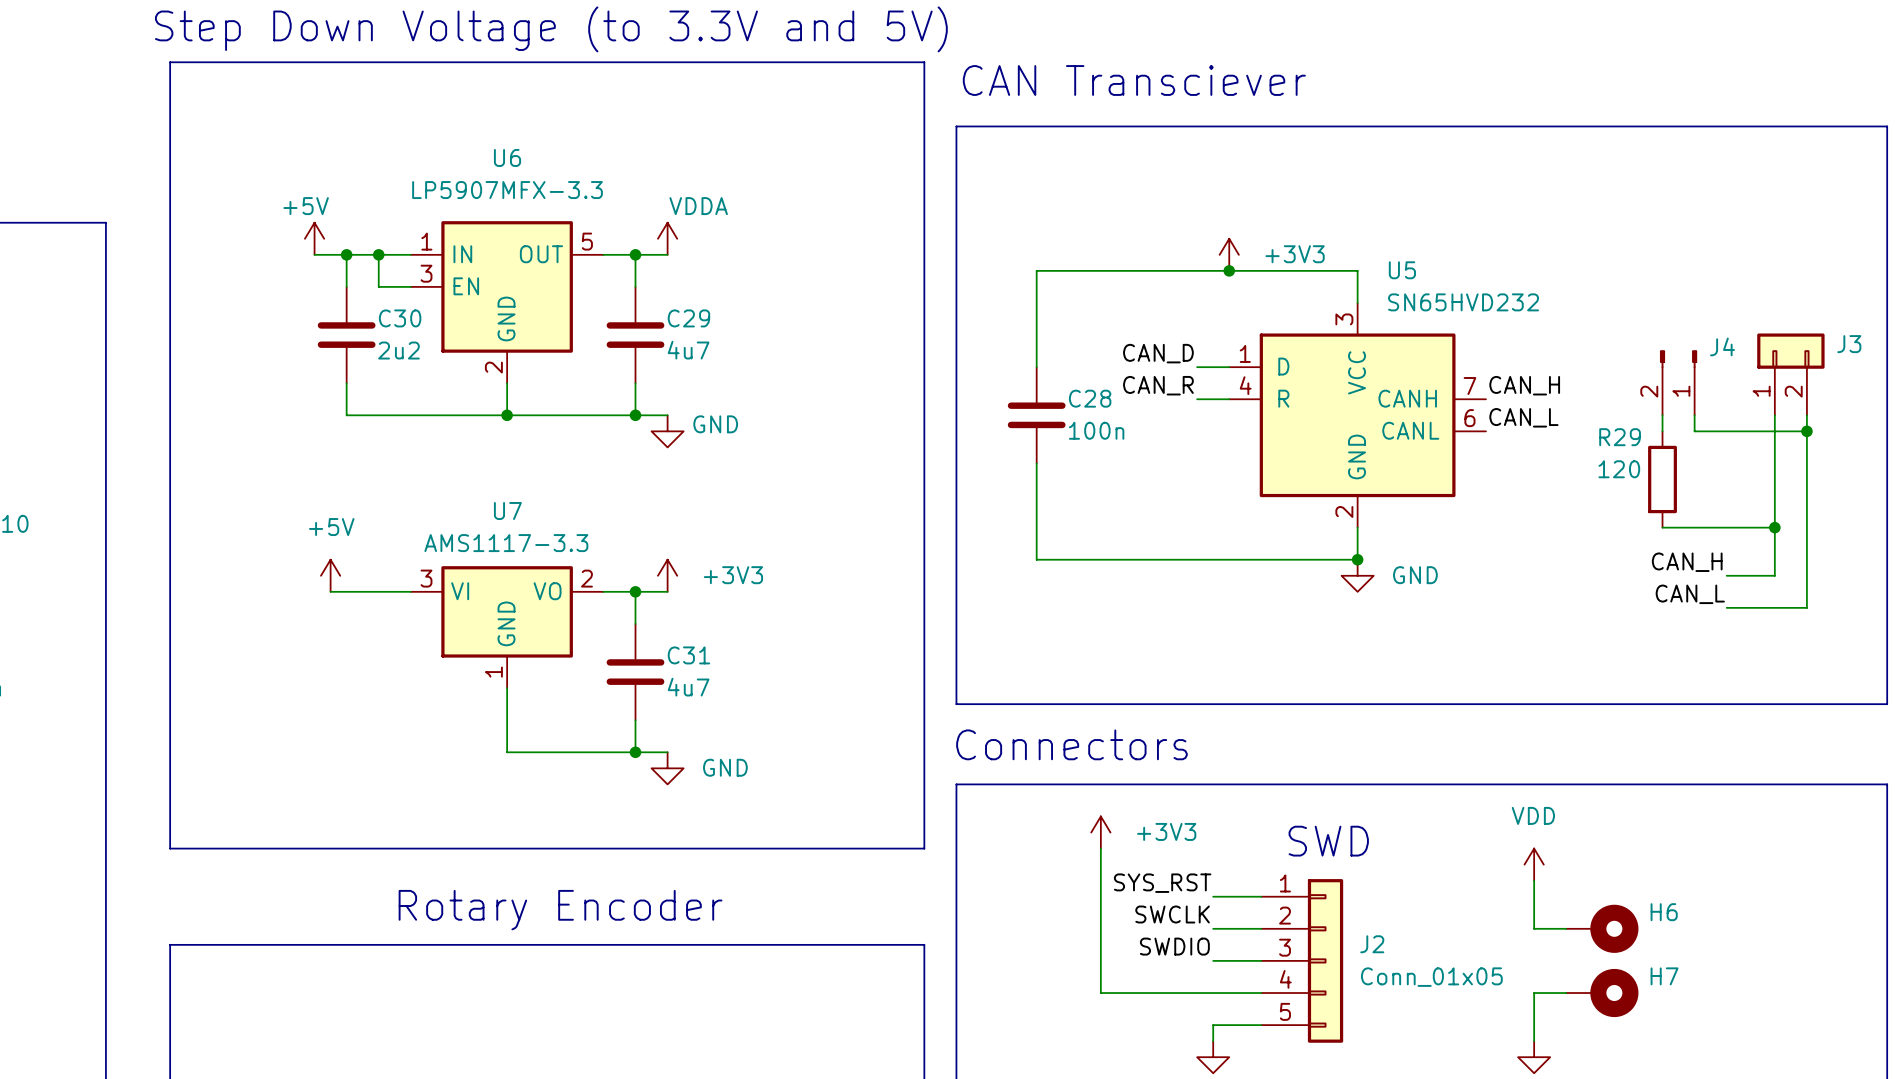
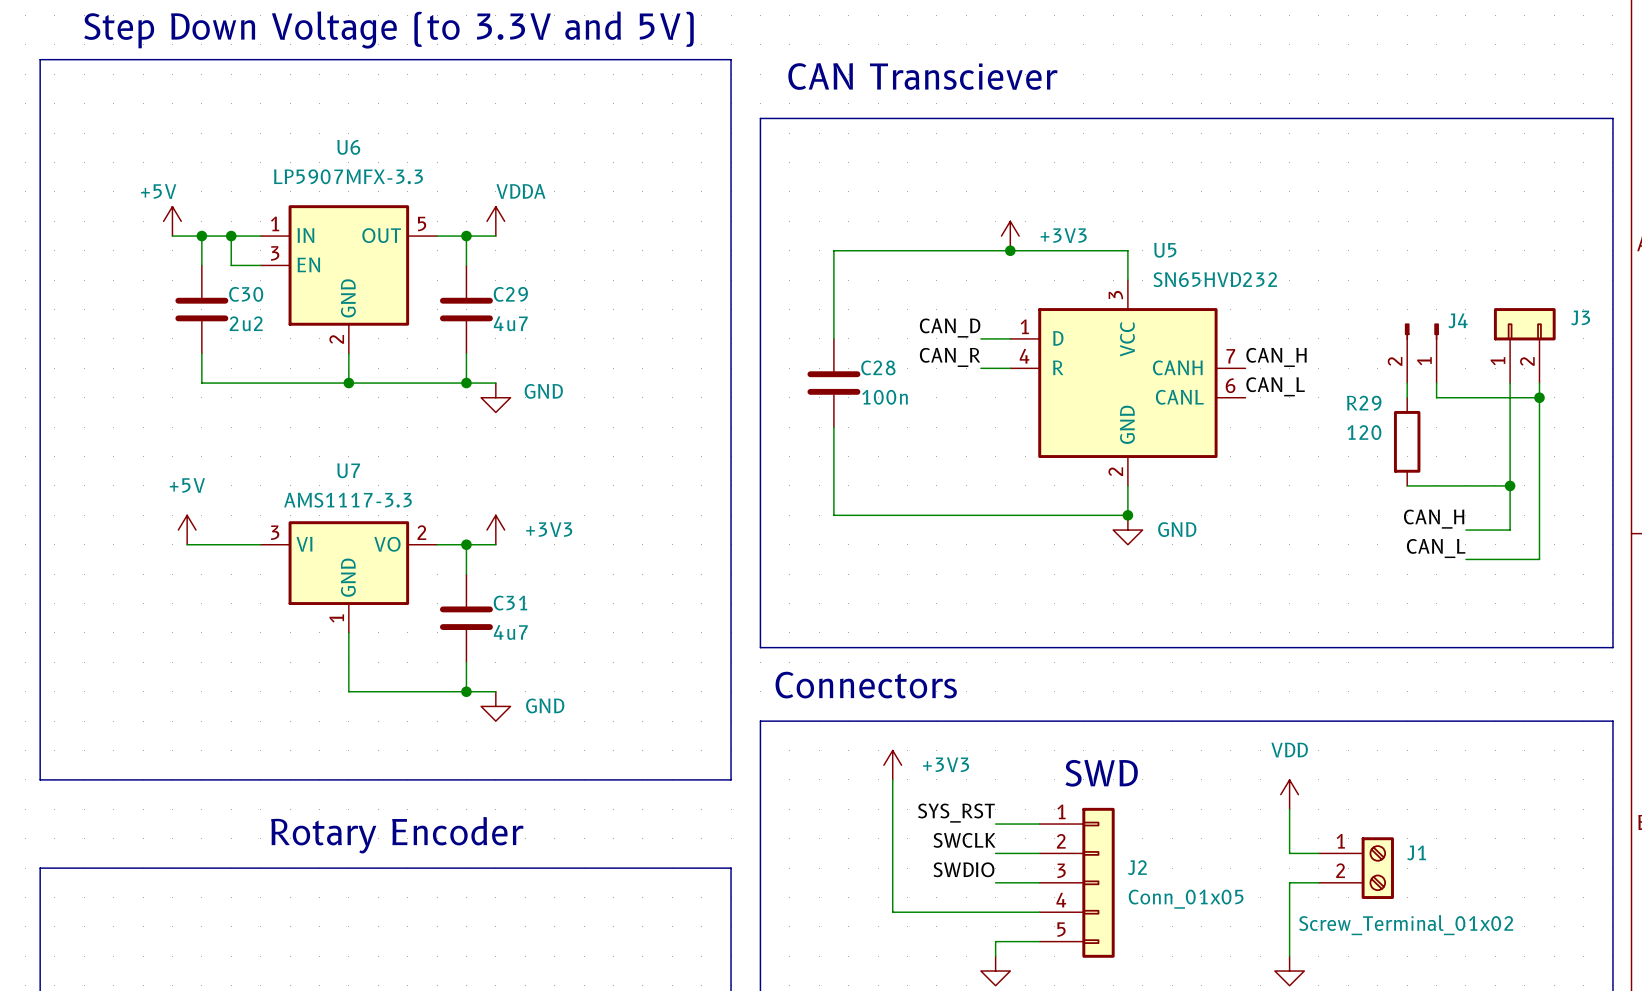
H6: (1602, 928) -> none
J1: none -> Screw_Terminal_01x02 (1356, 868)
wire: (1534, 993) (1566, 993) -> (1289, 912) (1289, 882) (1318, 882)
H7: (1602, 993) -> none

